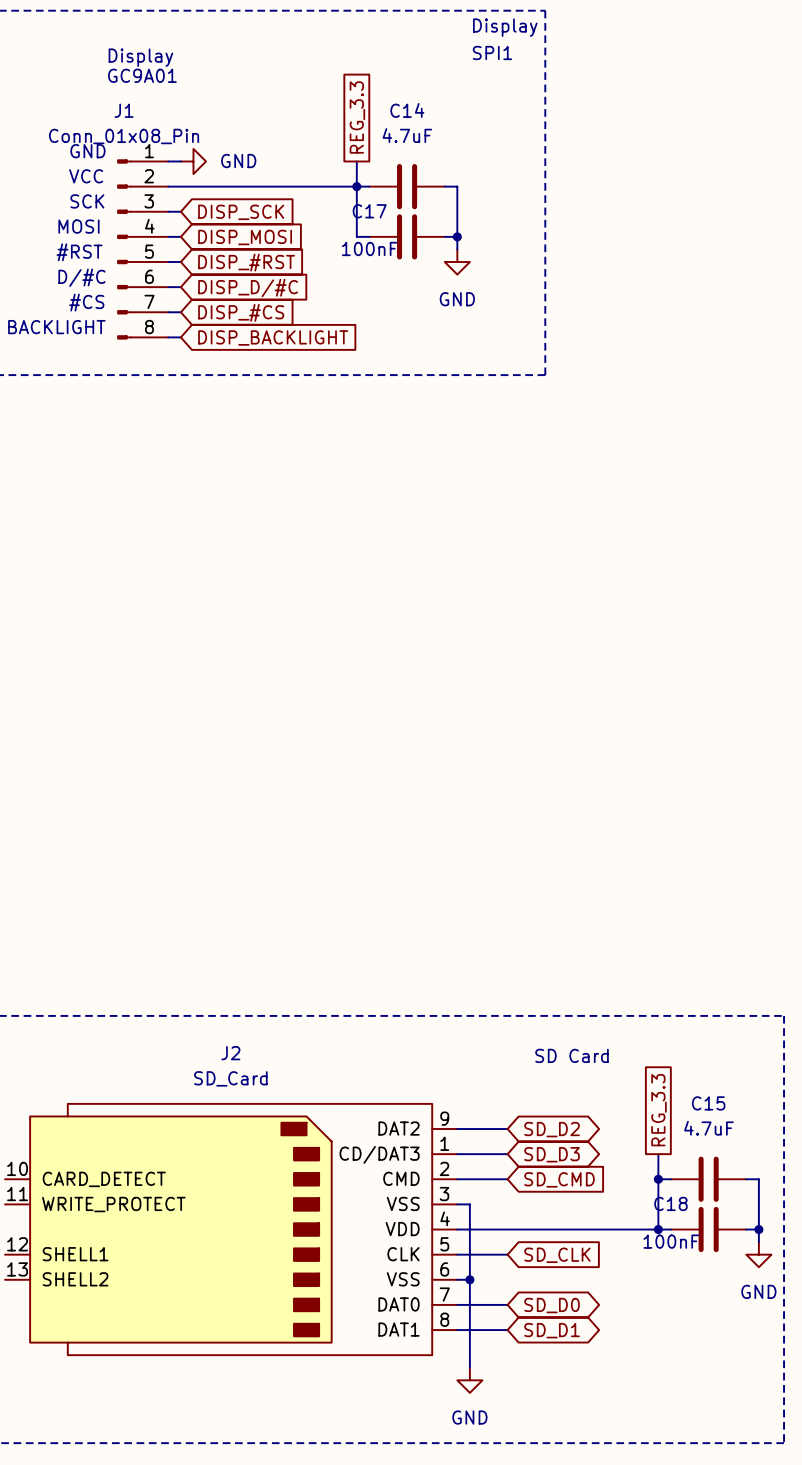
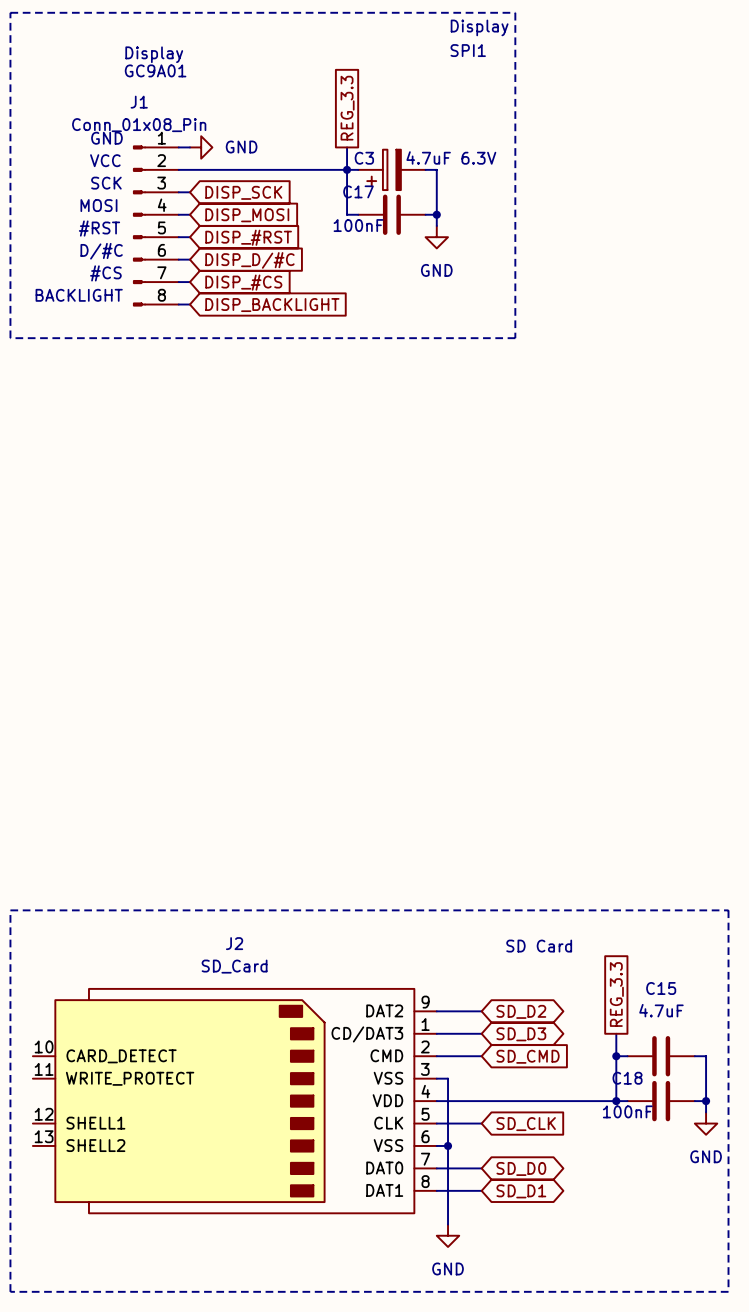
C14: 4.7uF (407, 186) -> none
C3: none -> 4.7uF 6.3V (391, 169)

